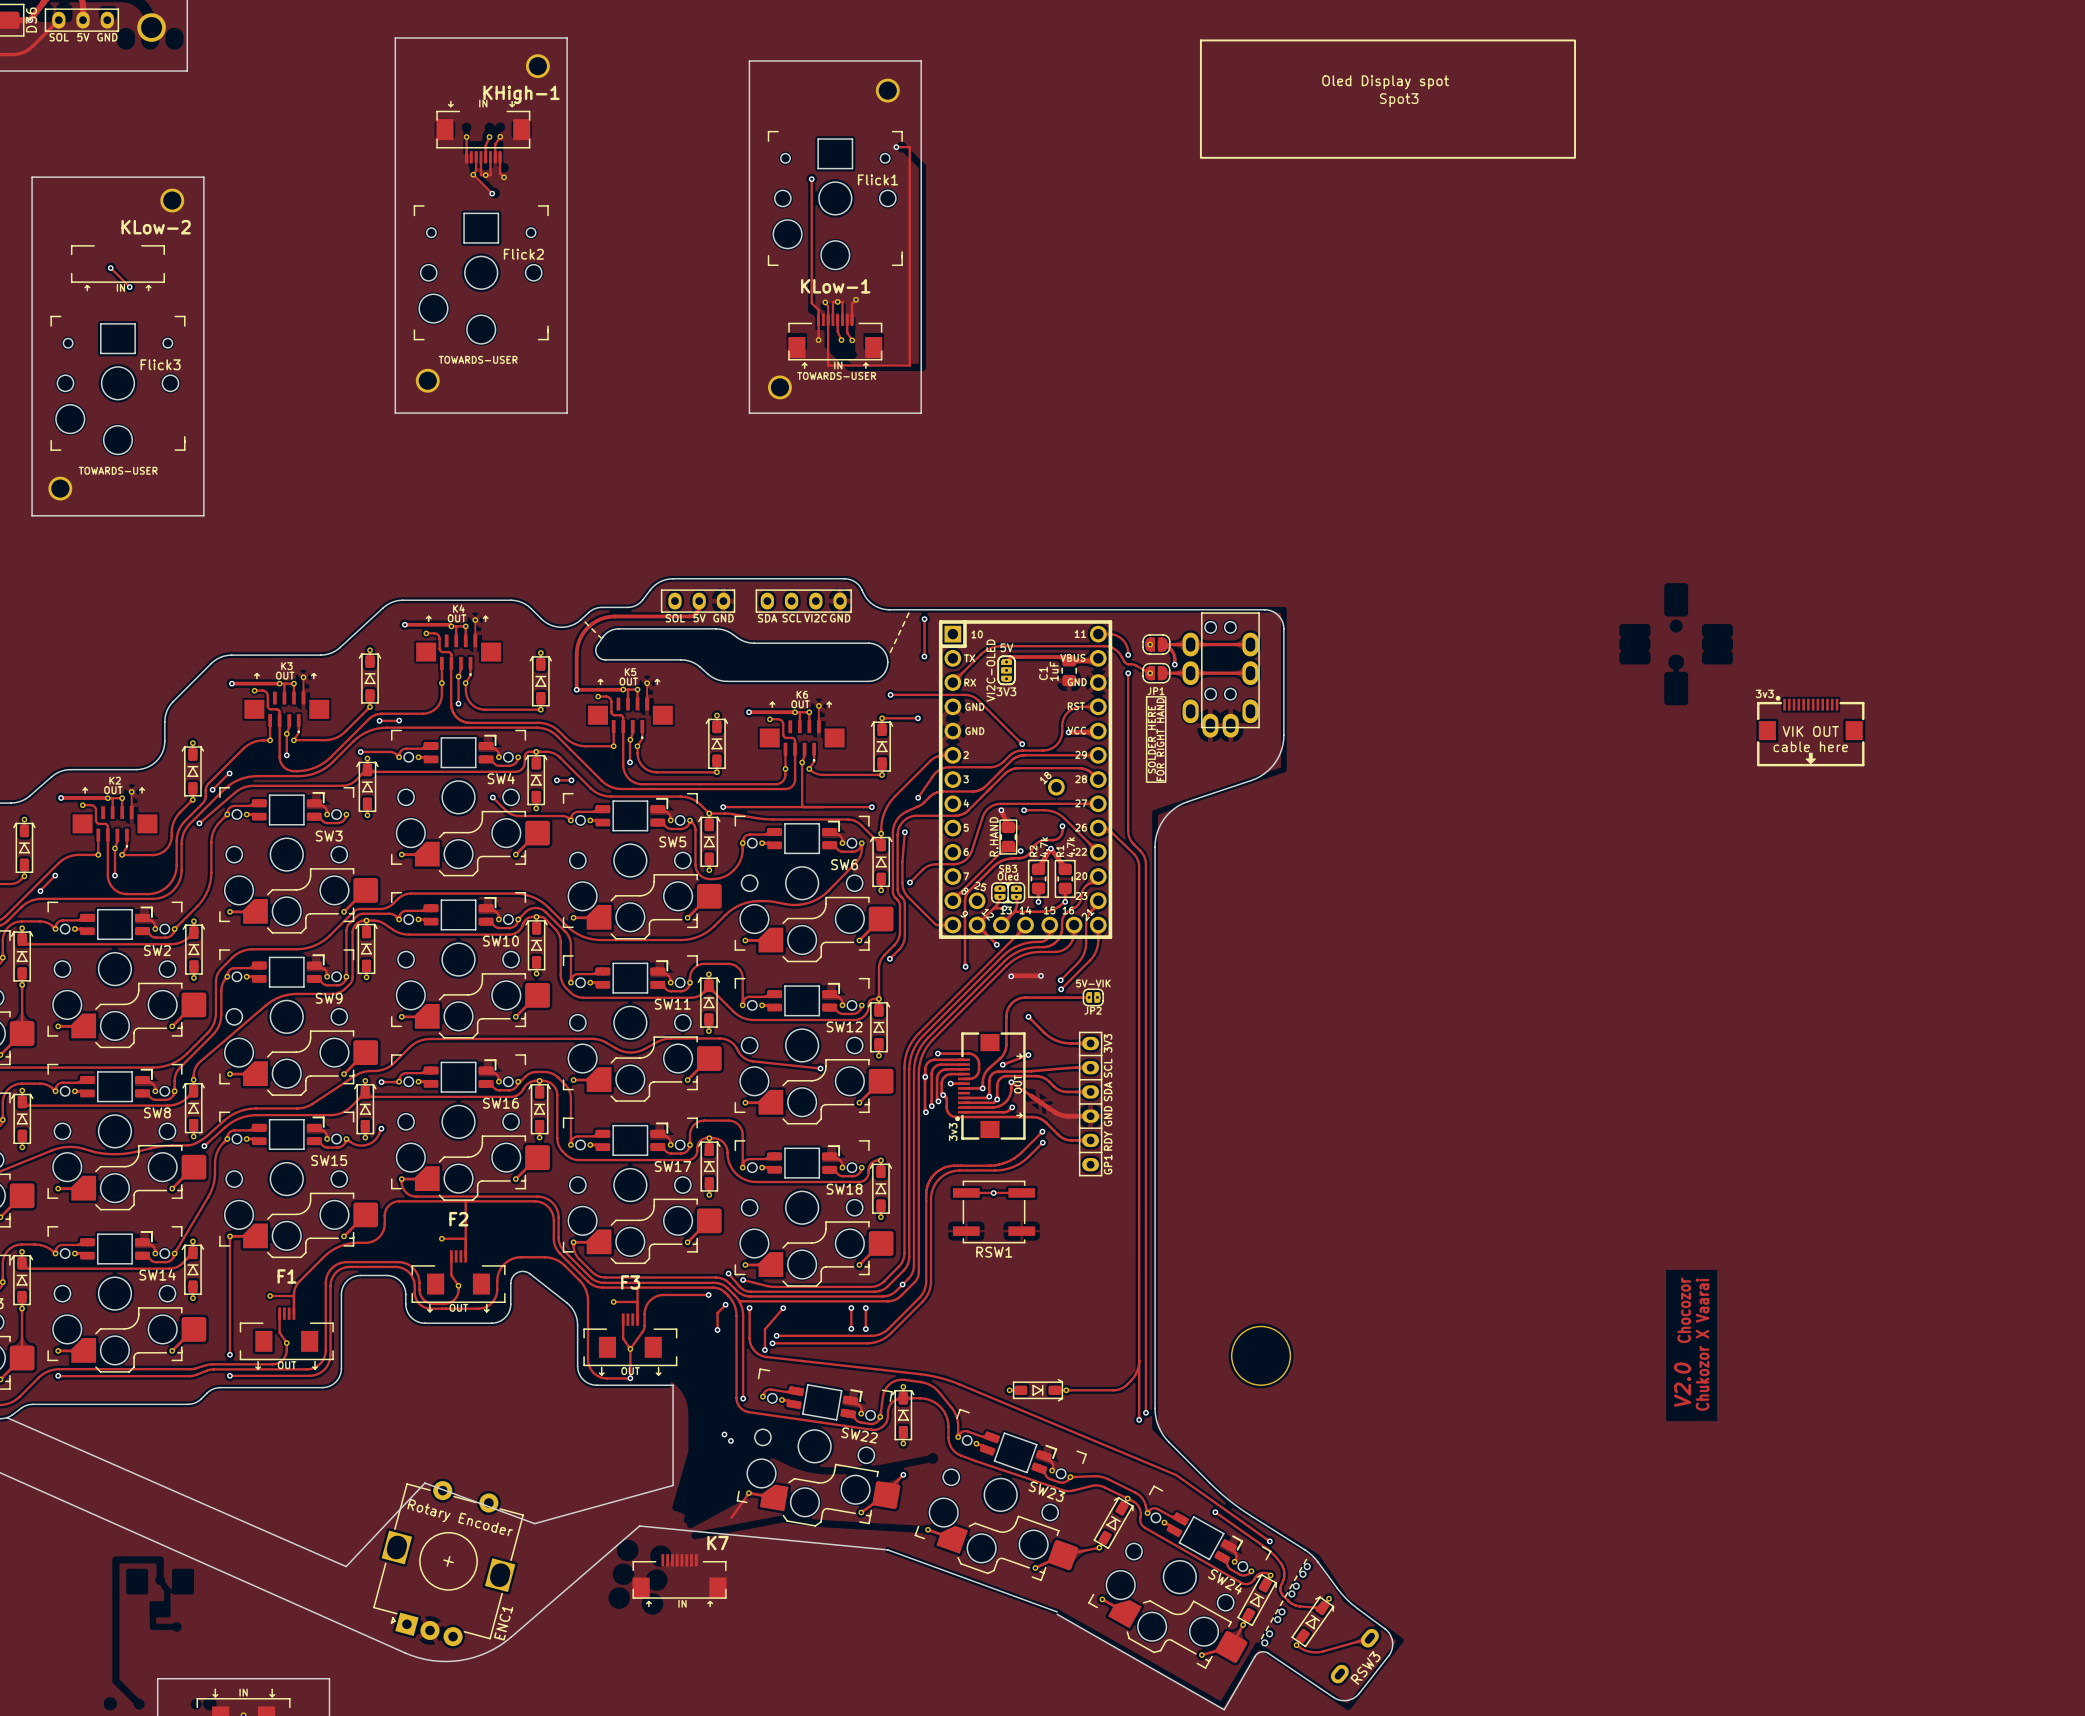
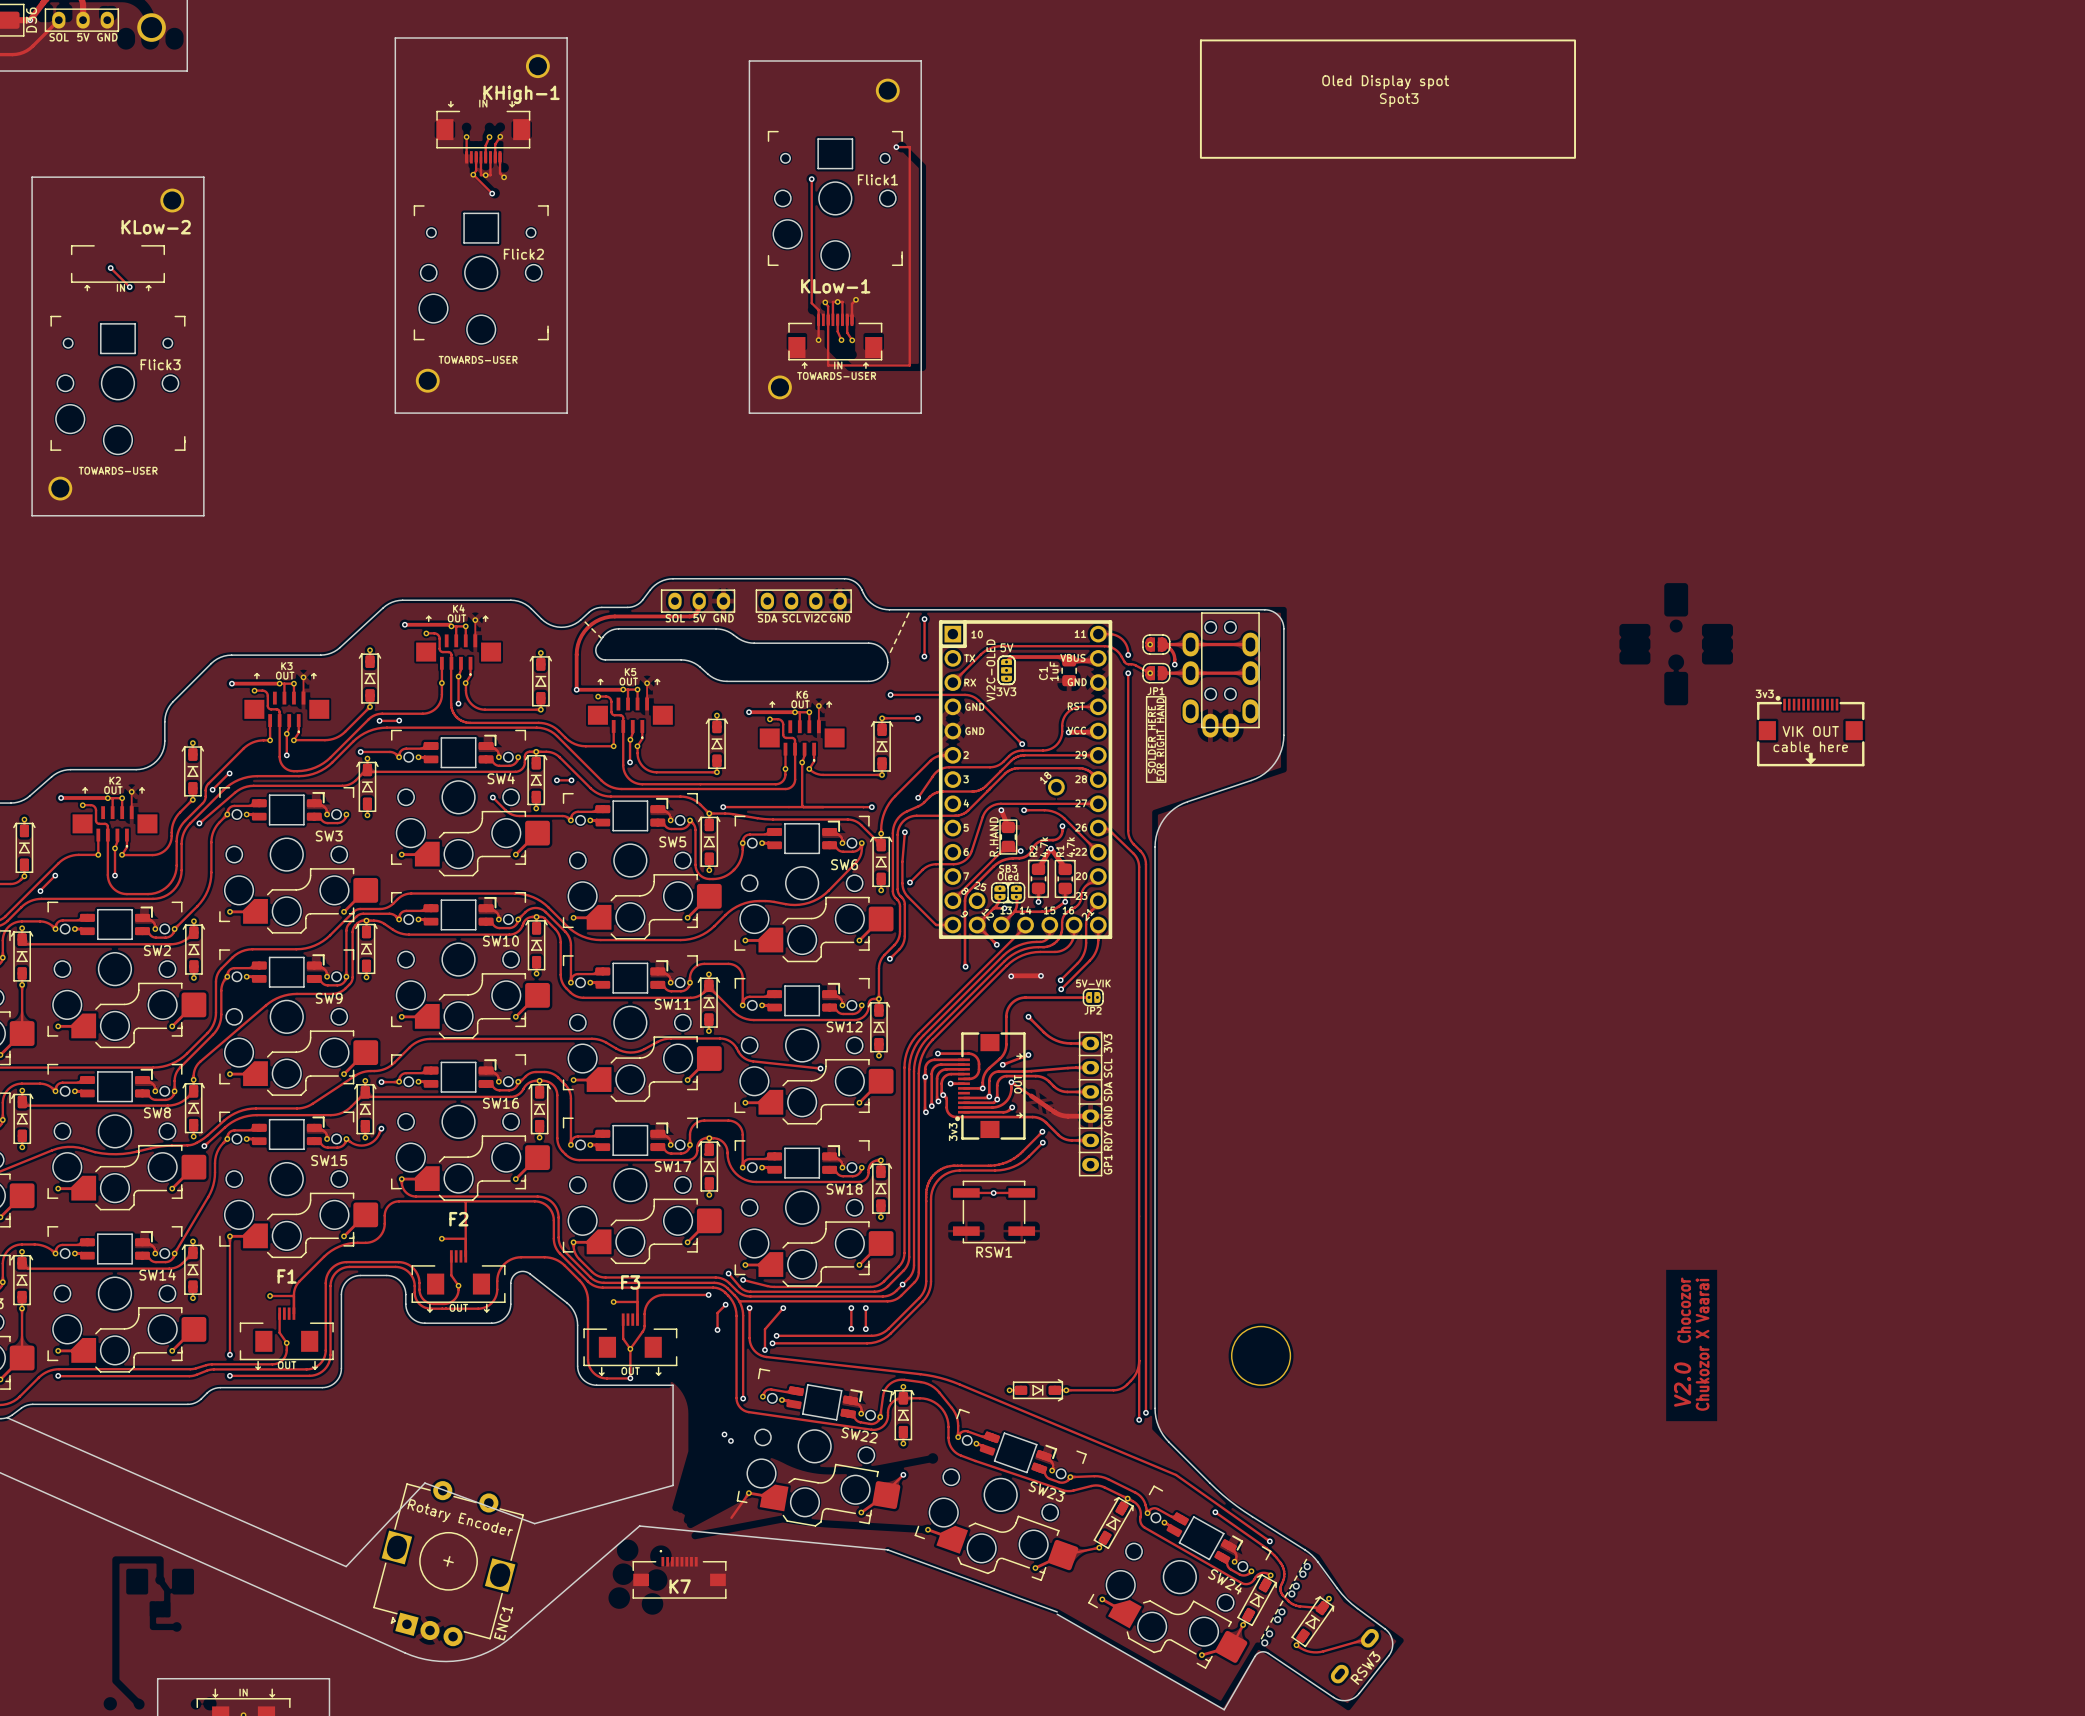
K7 name position: K7 (718, 1543) -> K7 (680, 1586)
K7 footprint: [632, 1554, 727, 1608] -> [632, 1550, 727, 1599]

